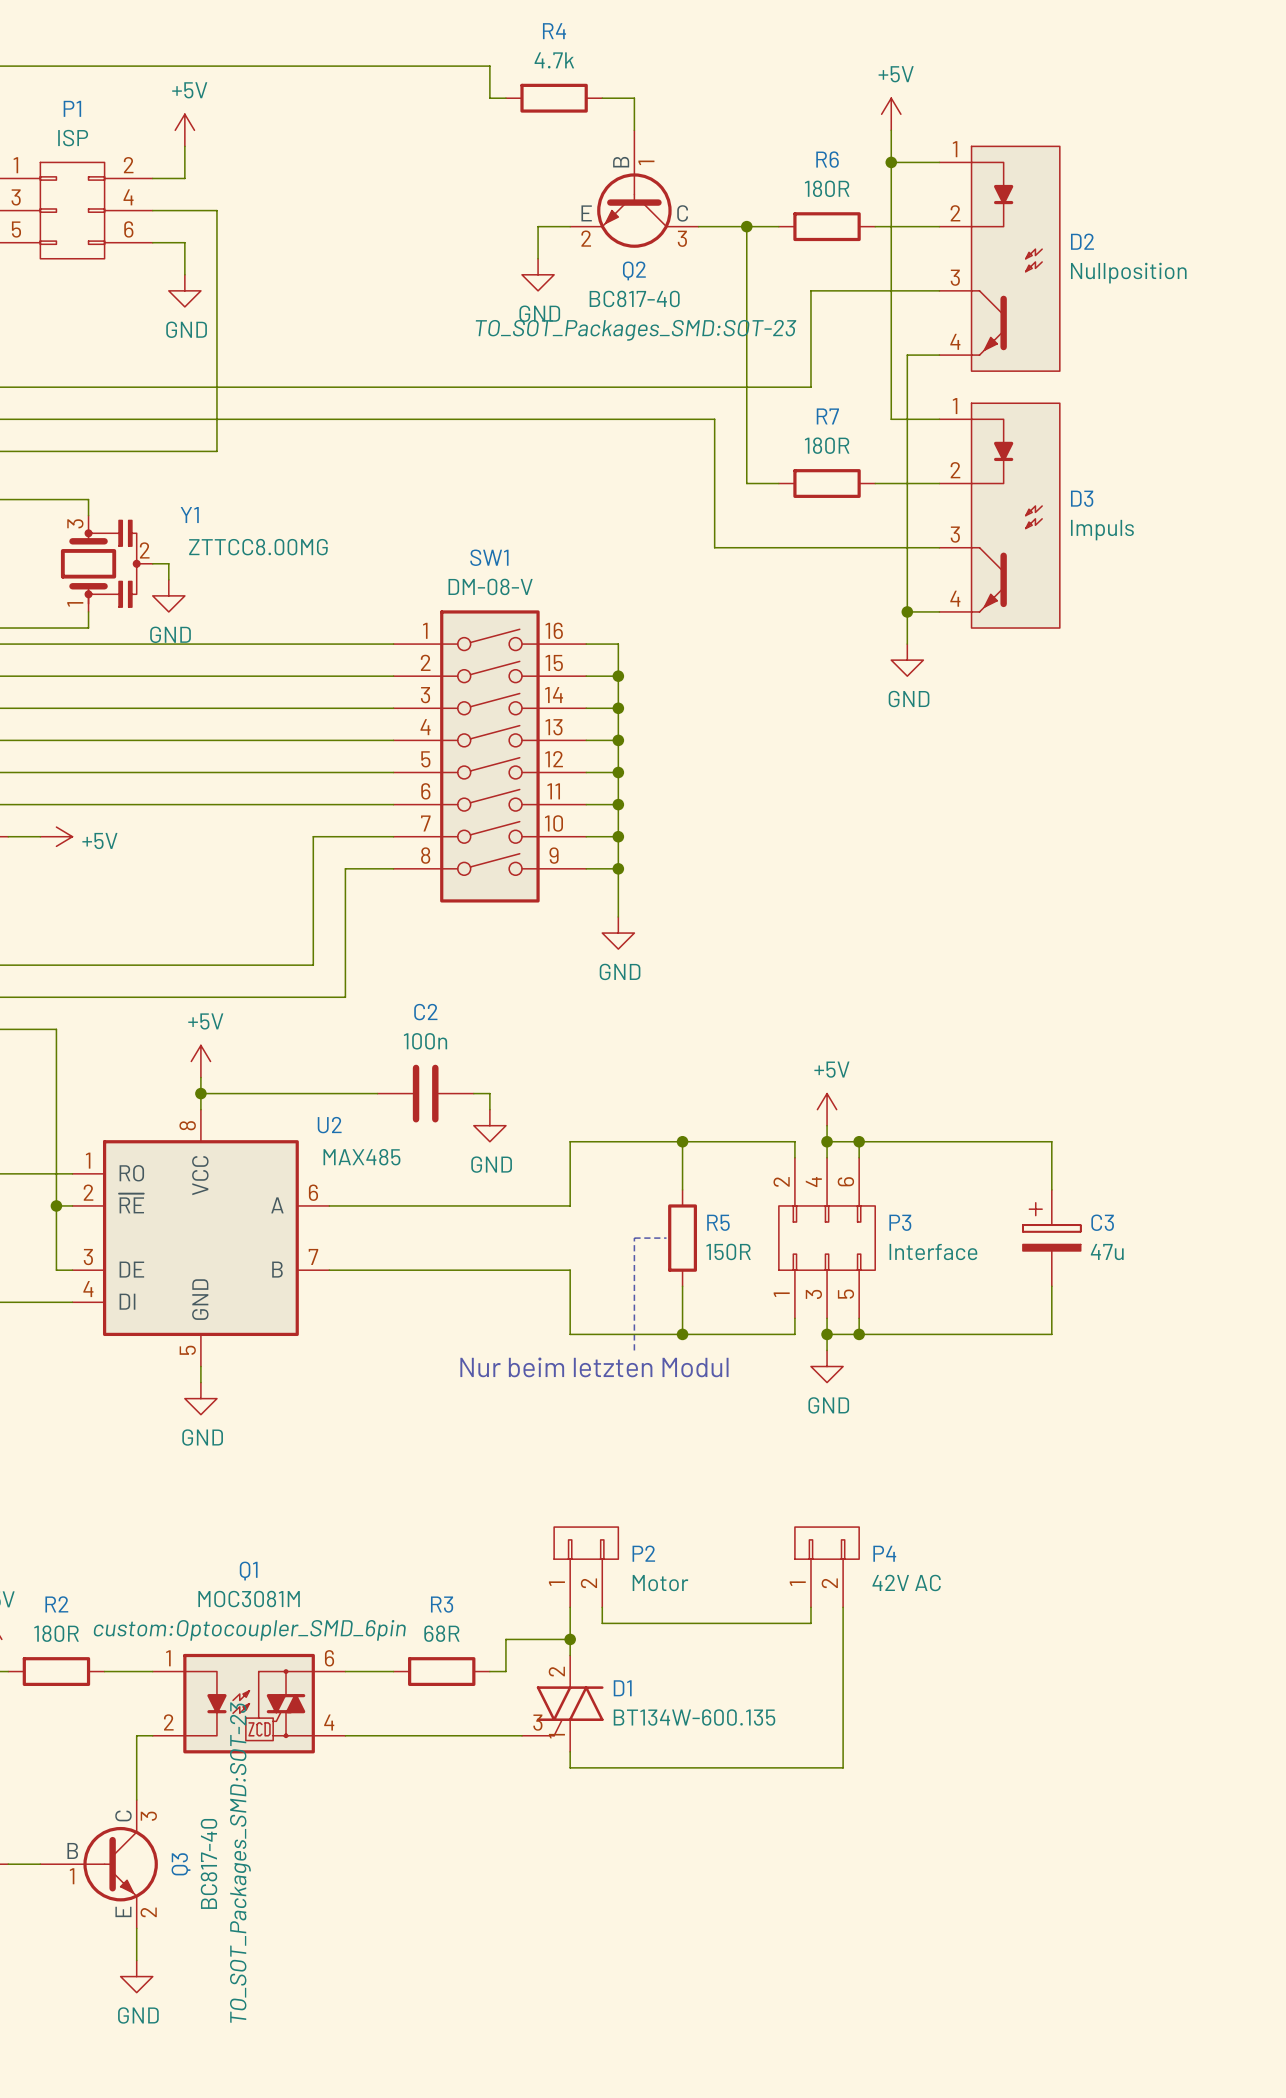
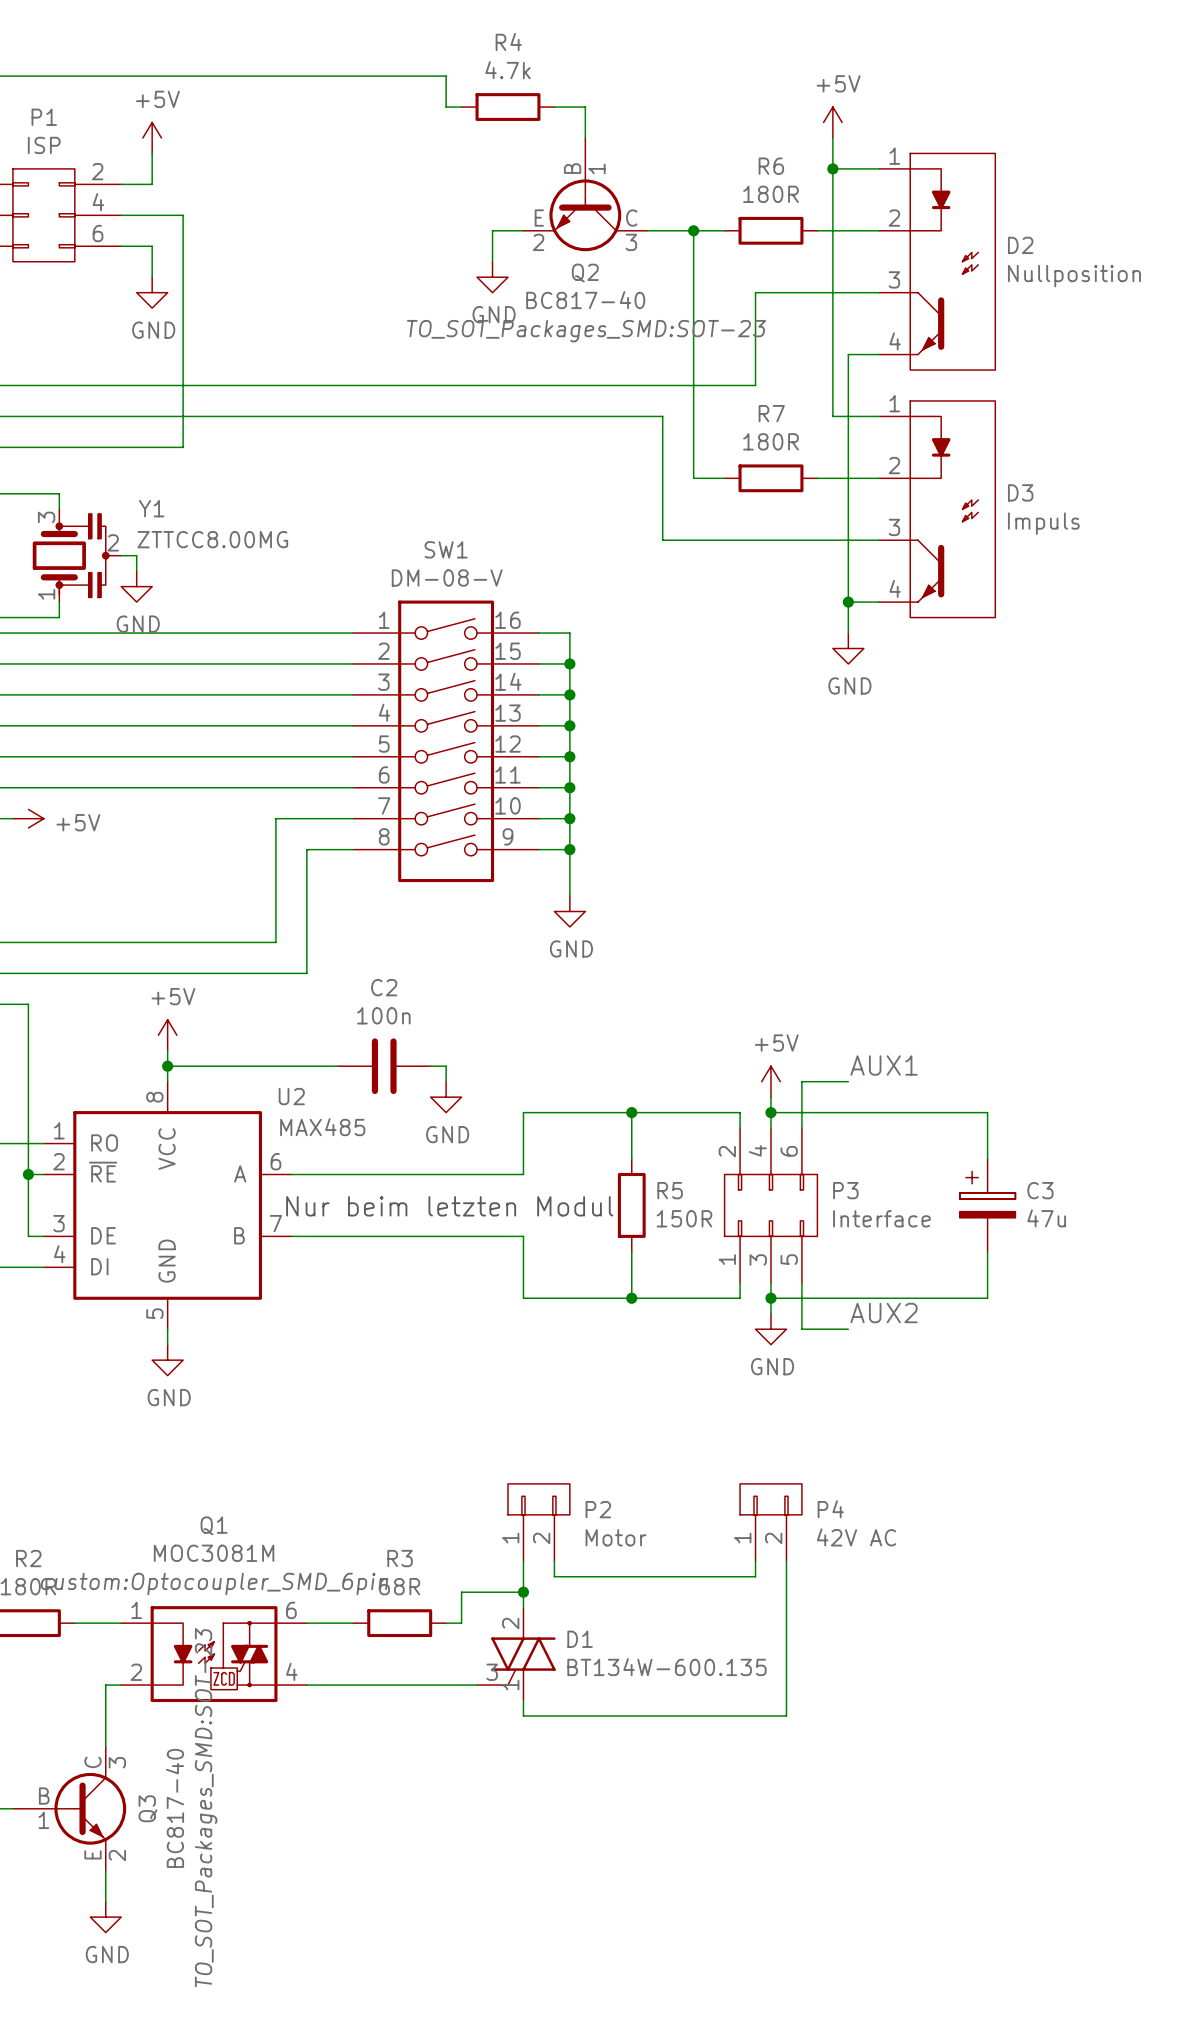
label: none -> AUX1 (884, 1065)
wire: none -> (848, 1081) (801, 1081) (801, 1112)
junction: (859, 1141) -> none
line: (666, 1238) (634, 1238) (634, 1350) -> none
wire: none -> (801, 1298) (801, 1329) (848, 1329)
junction: (859, 1334) -> none
label: none -> AUX2 (884, 1313)
text position: Nur beim letzten Modul (594, 1367) -> Nur beim letzten Modul (449, 1206)

